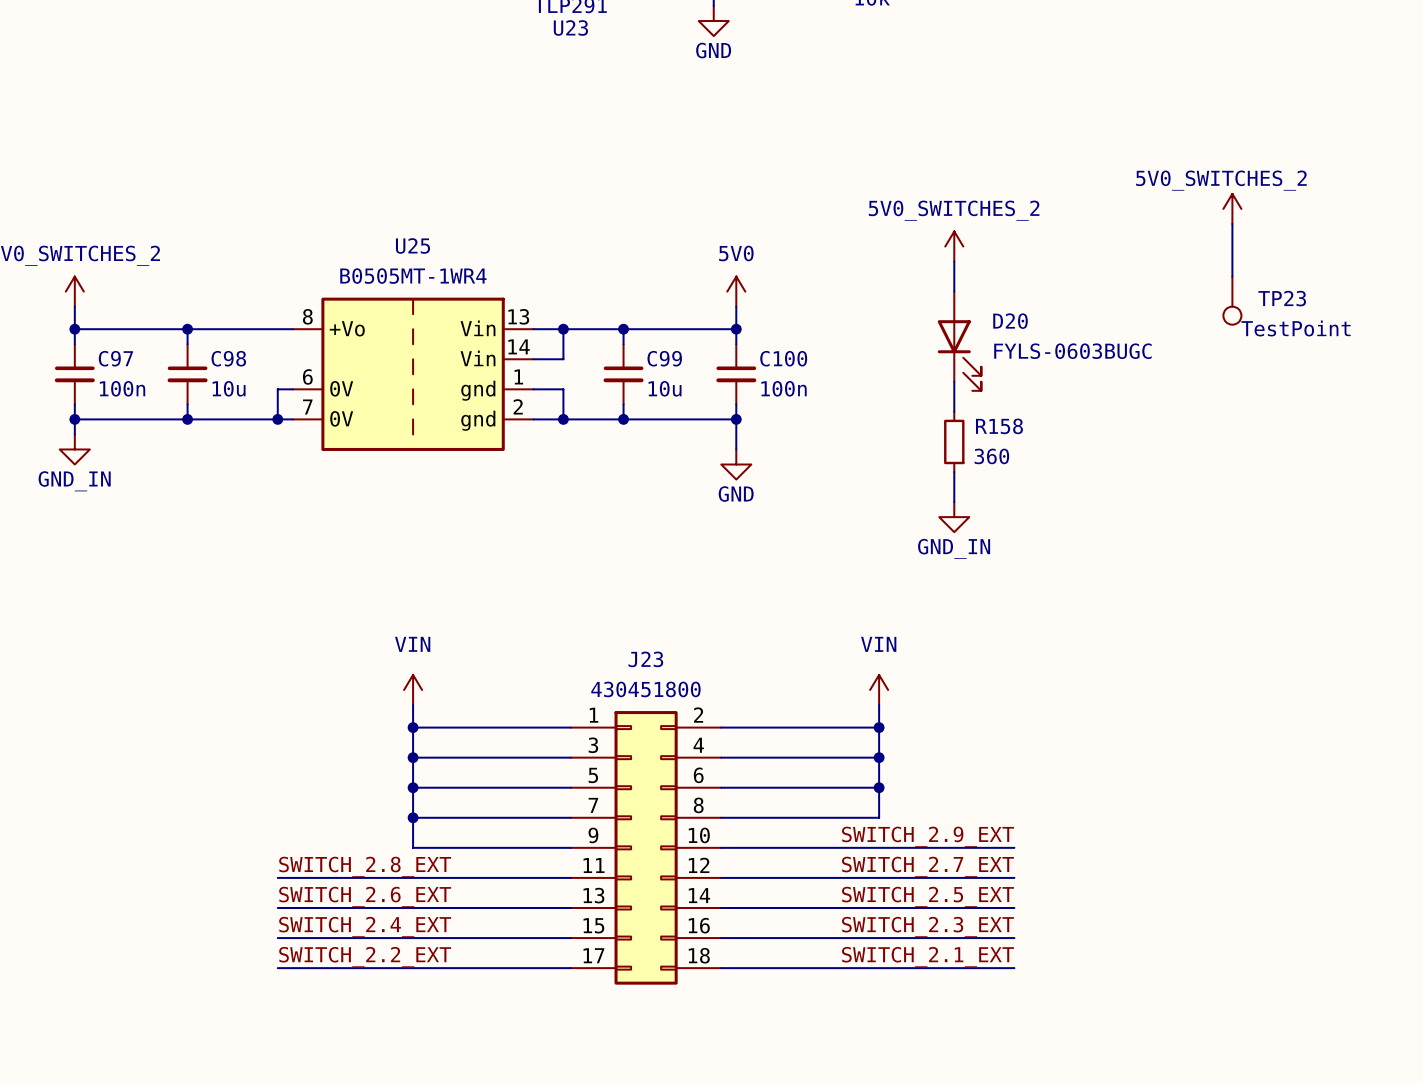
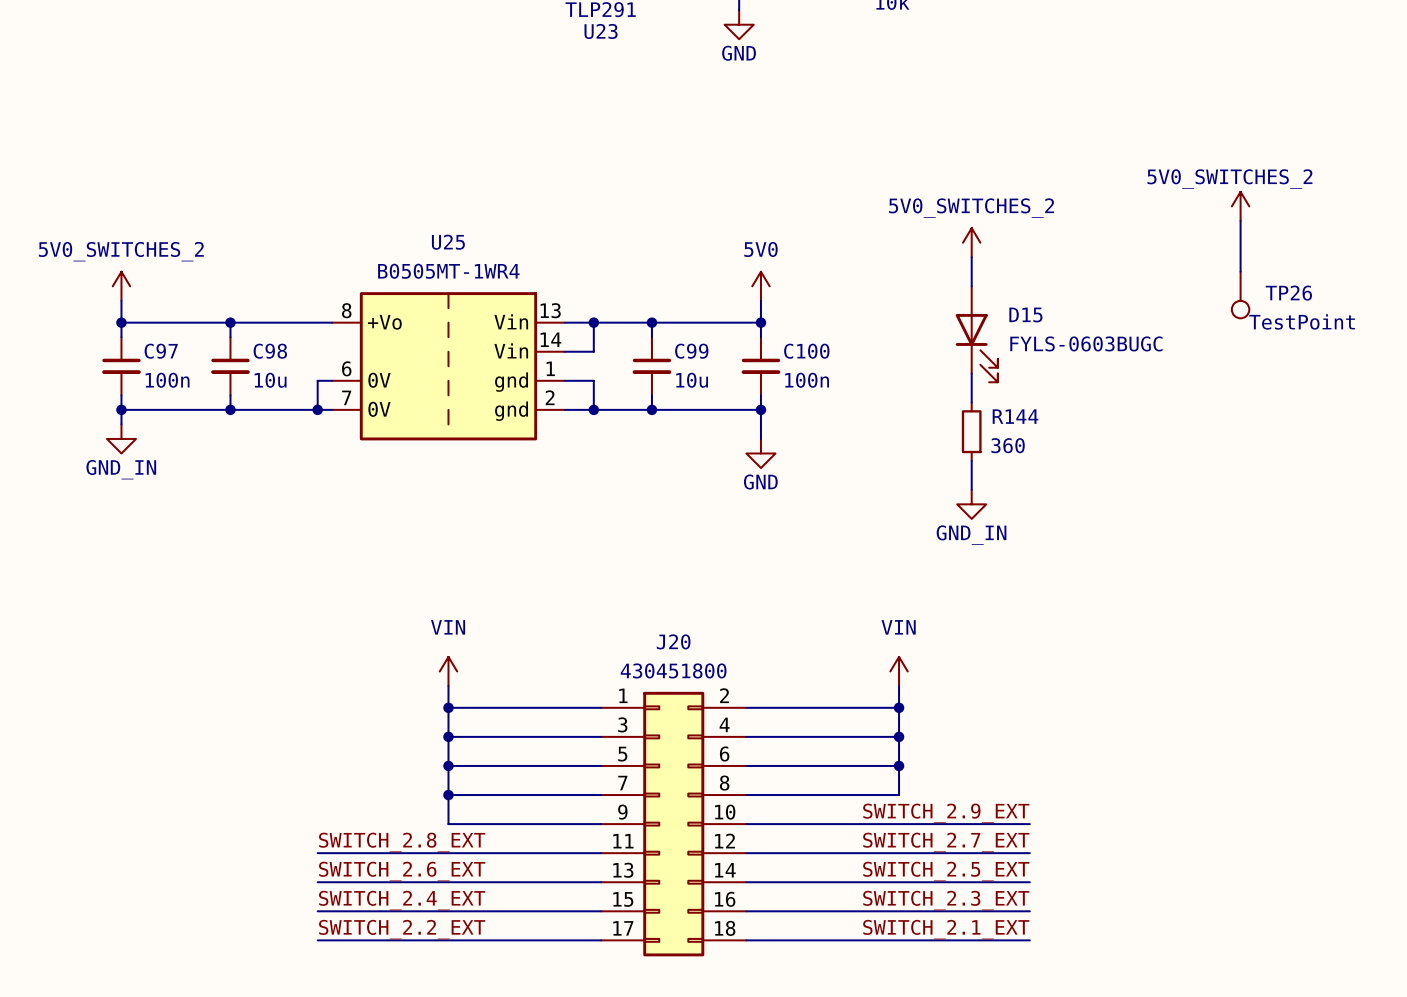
TP23 name: TP23 (1282, 298) -> TP26 (1288, 293)
D20 name: D20 (1010, 321) -> D15 (1025, 315)
R158 name: R158 (999, 426) -> R144 (1015, 416)
J23 name: J23 (645, 659) -> J20 (673, 641)

